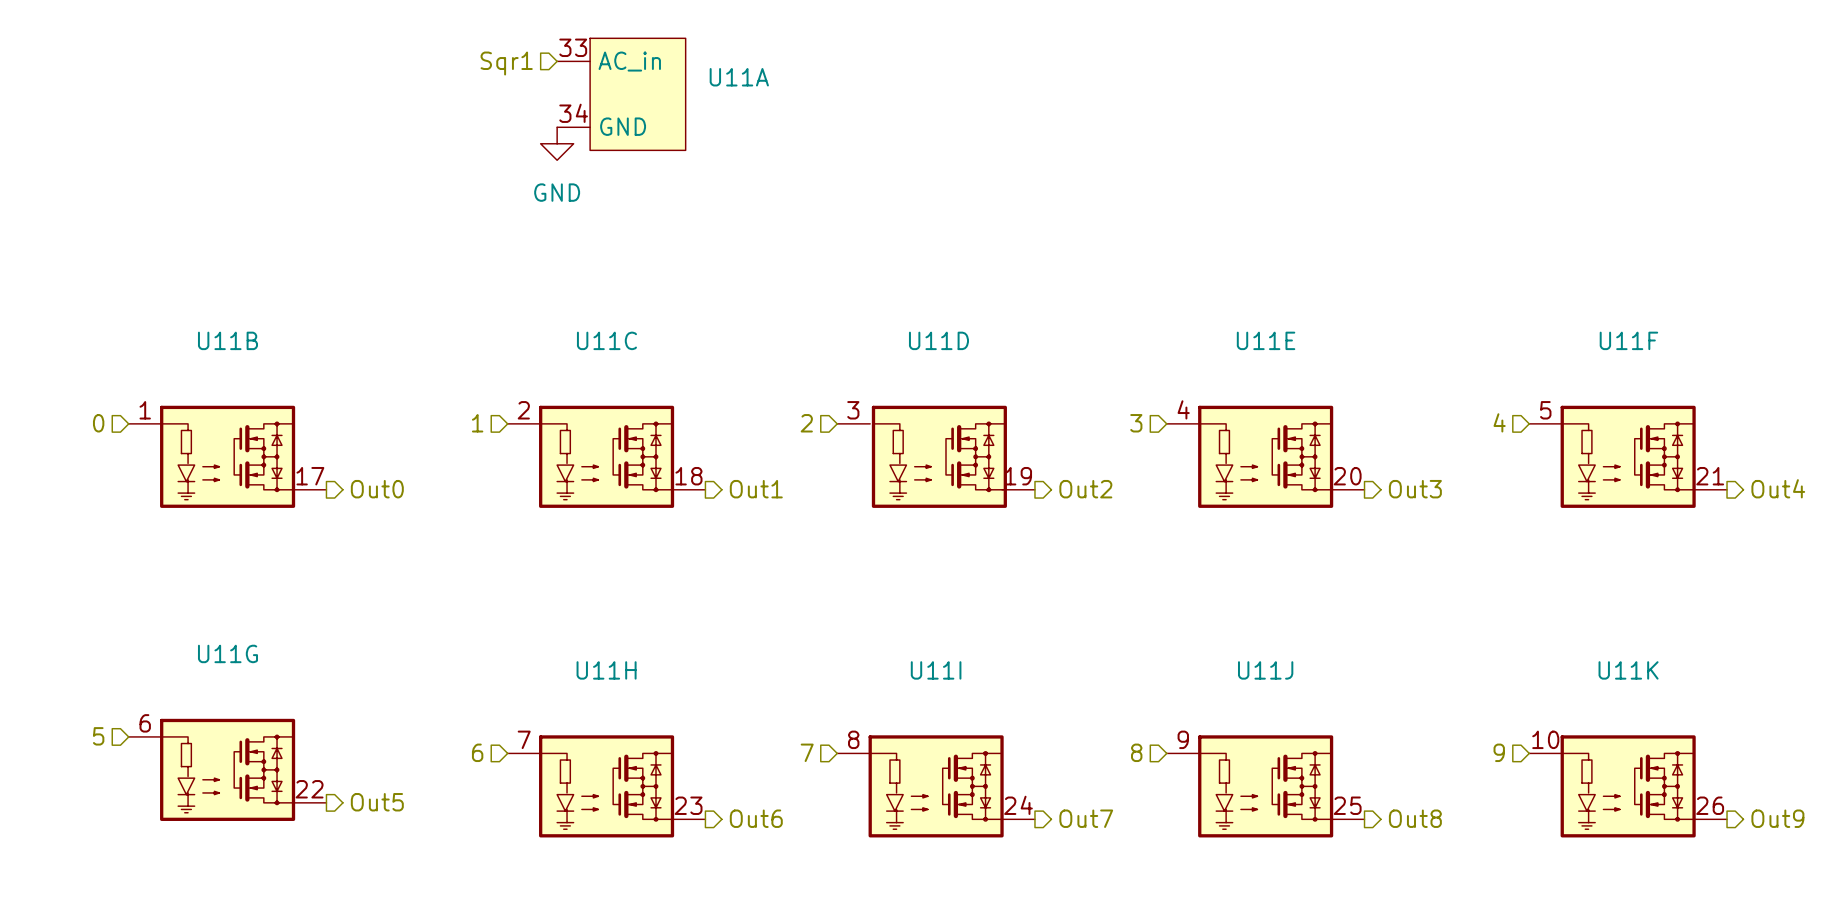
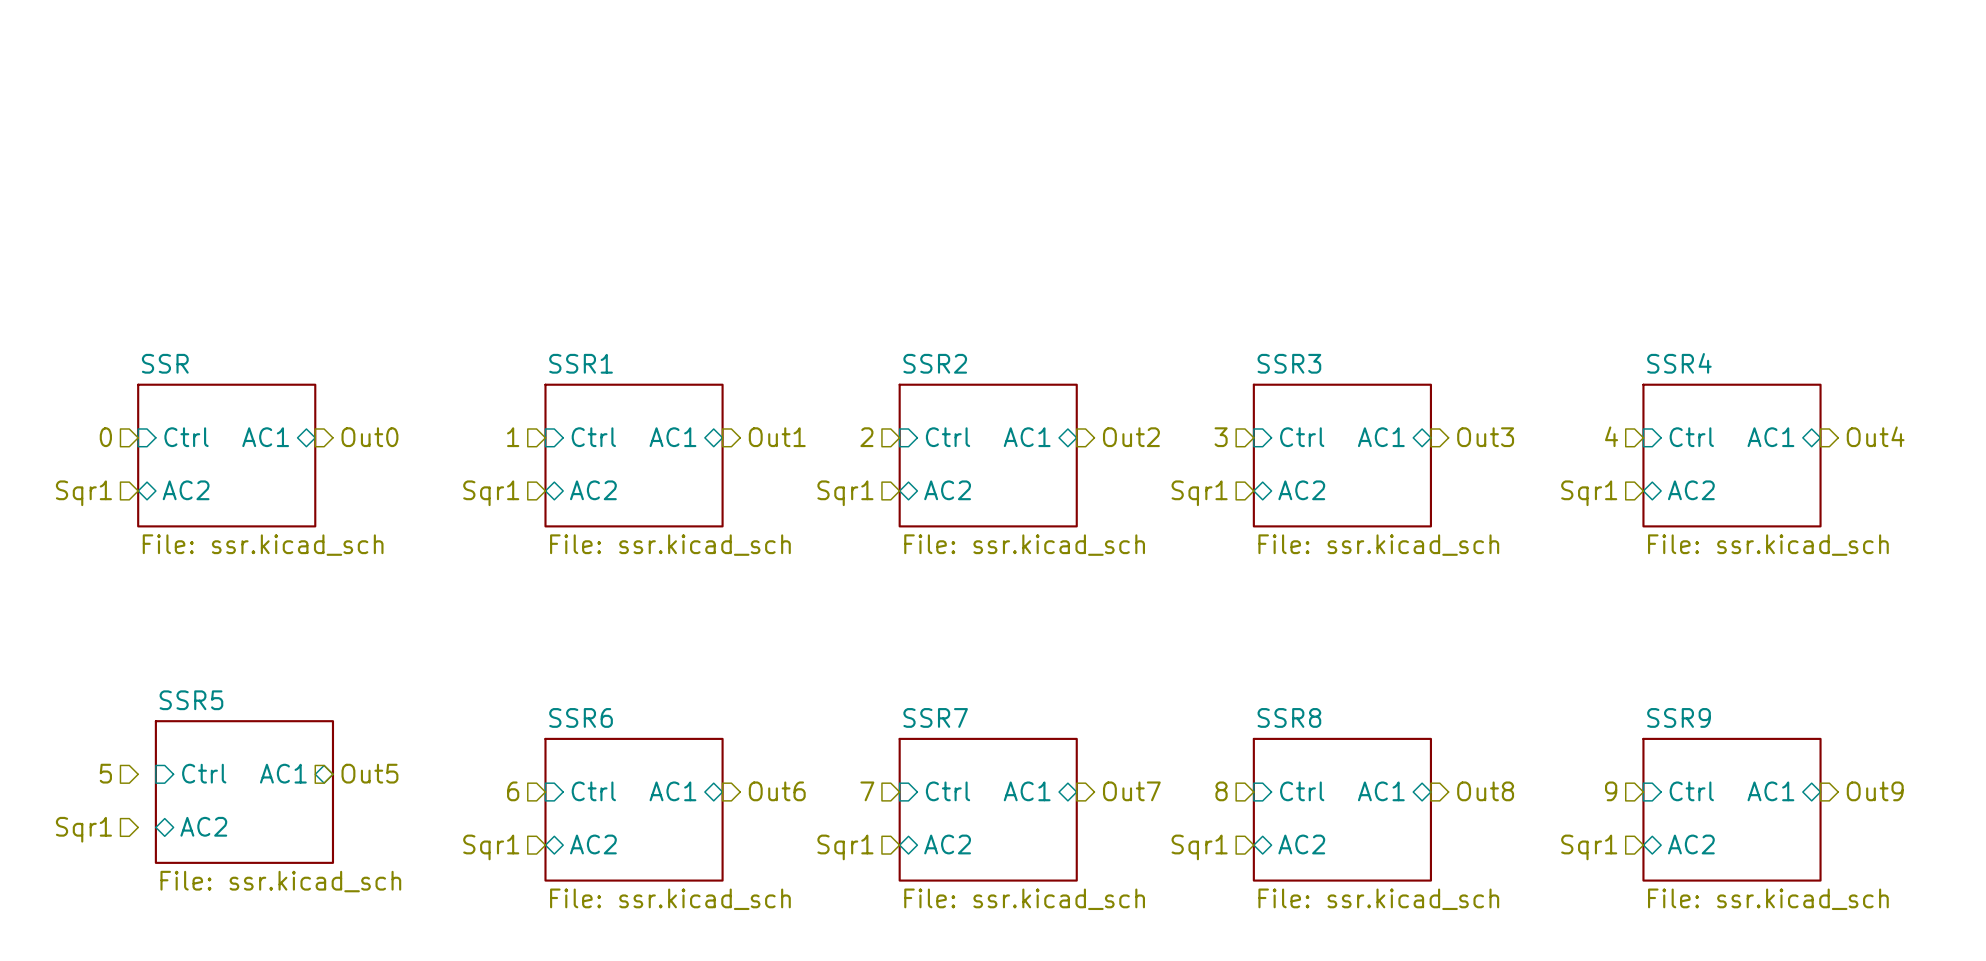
hierarchical label: Sqr1 (506, 63) -> none
U11A: (621, 94) -> none
power symbol: GND (557, 143) -> none
sheet pin: none -> Ctrl (186, 437)
sheet pin: none -> AC1 (265, 437)
sheet pin: none -> Ctrl (593, 437)
sheet pin: none -> AC1 (672, 437)
sheet pin: none -> Ctrl (948, 437)
sheet pin: none -> AC1 (1027, 437)
sheet pin: none -> Ctrl (1302, 437)
sheet pin: none -> AC1 (1381, 437)
sheet pin: none -> Ctrl (1691, 437)
sheet pin: none -> AC1 (1770, 437)
sheet SSR: none -> File: ssr.kicad_sch (226, 455)
sheet SSR1: none -> File: ssr.kicad_sch (634, 455)
sheet SSR2: none -> File: ssr.kicad_sch (988, 455)
sheet SSR3: none -> File: ssr.kicad_sch (1342, 455)
sheet SSR4: none -> File: ssr.kicad_sch (1731, 455)
U11B: (227, 456) -> none
U11C: (606, 456) -> none
U11D: (936, 456) -> none
U11E: (1265, 456) -> none
U11F: (1628, 456) -> none
sheet pin: none -> AC2 (186, 490)
sheet pin: none -> AC2 (593, 490)
sheet pin: none -> AC2 (947, 490)
sheet pin: none -> AC2 (1301, 490)
sheet pin: none -> AC2 (1691, 490)
hierarchical label: none -> Sqr1 (83, 493)
hierarchical label: none -> Sqr1 (491, 493)
hierarchical label: none -> Sqr1 (845, 493)
hierarchical label: none -> Sqr1 (1199, 493)
hierarchical label: none -> Sqr1 (1589, 493)
hierarchical label position: Out4 (1778, 488) -> Out4 (1875, 436)
hierarchical label position: Out0 (377, 489) -> Out0 (369, 437)
hierarchical label position: Out1 (756, 489) -> Out1 (777, 437)
hierarchical label position: Out2 (1085, 489) -> Out2 (1131, 437)
hierarchical label position: Out3 (1415, 489) -> Out3 (1485, 437)
sheet pin: none -> Ctrl (204, 773)
sheet pin: none -> AC1 (283, 773)
sheet pin: none -> Ctrl (593, 791)
sheet pin: none -> AC1 (672, 791)
sheet pin: none -> Ctrl (948, 791)
sheet pin: none -> AC1 (1027, 791)
sheet pin: none -> Ctrl (1302, 791)
sheet pin: none -> AC1 (1381, 791)
sheet pin: none -> Ctrl (1691, 791)
sheet pin: none -> AC1 (1770, 791)
sheet SSR5: none -> File: ssr.kicad_sch (244, 792)
U11G: (227, 769) -> none
sheet SSR6: none -> File: ssr.kicad_sch (634, 809)
sheet SSR7: none -> File: ssr.kicad_sch (988, 809)
sheet SSR8: none -> File: ssr.kicad_sch (1342, 809)
sheet SSR9: none -> File: ssr.kicad_sch (1731, 809)
sheet pin: none -> AC2 (203, 826)
U11H: (606, 786) -> none
U11I: (936, 786) -> none
U11J: (1265, 786) -> none
U11K: (1628, 786) -> none
hierarchical label: none -> Sqr1 (83, 829)
hierarchical label position: Out5 (377, 802) -> Out5 (369, 773)
sheet pin: none -> AC2 (593, 844)
sheet pin: none -> AC2 (947, 844)
sheet pin: none -> AC2 (1301, 844)
sheet pin: none -> AC2 (1691, 844)
hierarchical label: none -> Sqr1 (491, 847)
hierarchical label: none -> Sqr1 (845, 847)
hierarchical label: none -> Sqr1 (1199, 847)
hierarchical label: none -> Sqr1 (1589, 847)
hierarchical label position: Out6 (756, 818) -> Out6 (777, 791)
hierarchical label position: Out7 (1086, 818) -> Out7 (1131, 791)
hierarchical label position: Out8 (1415, 818) -> Out8 (1485, 791)
hierarchical label position: Out9 (1777, 818) -> Out9 (1875, 791)

